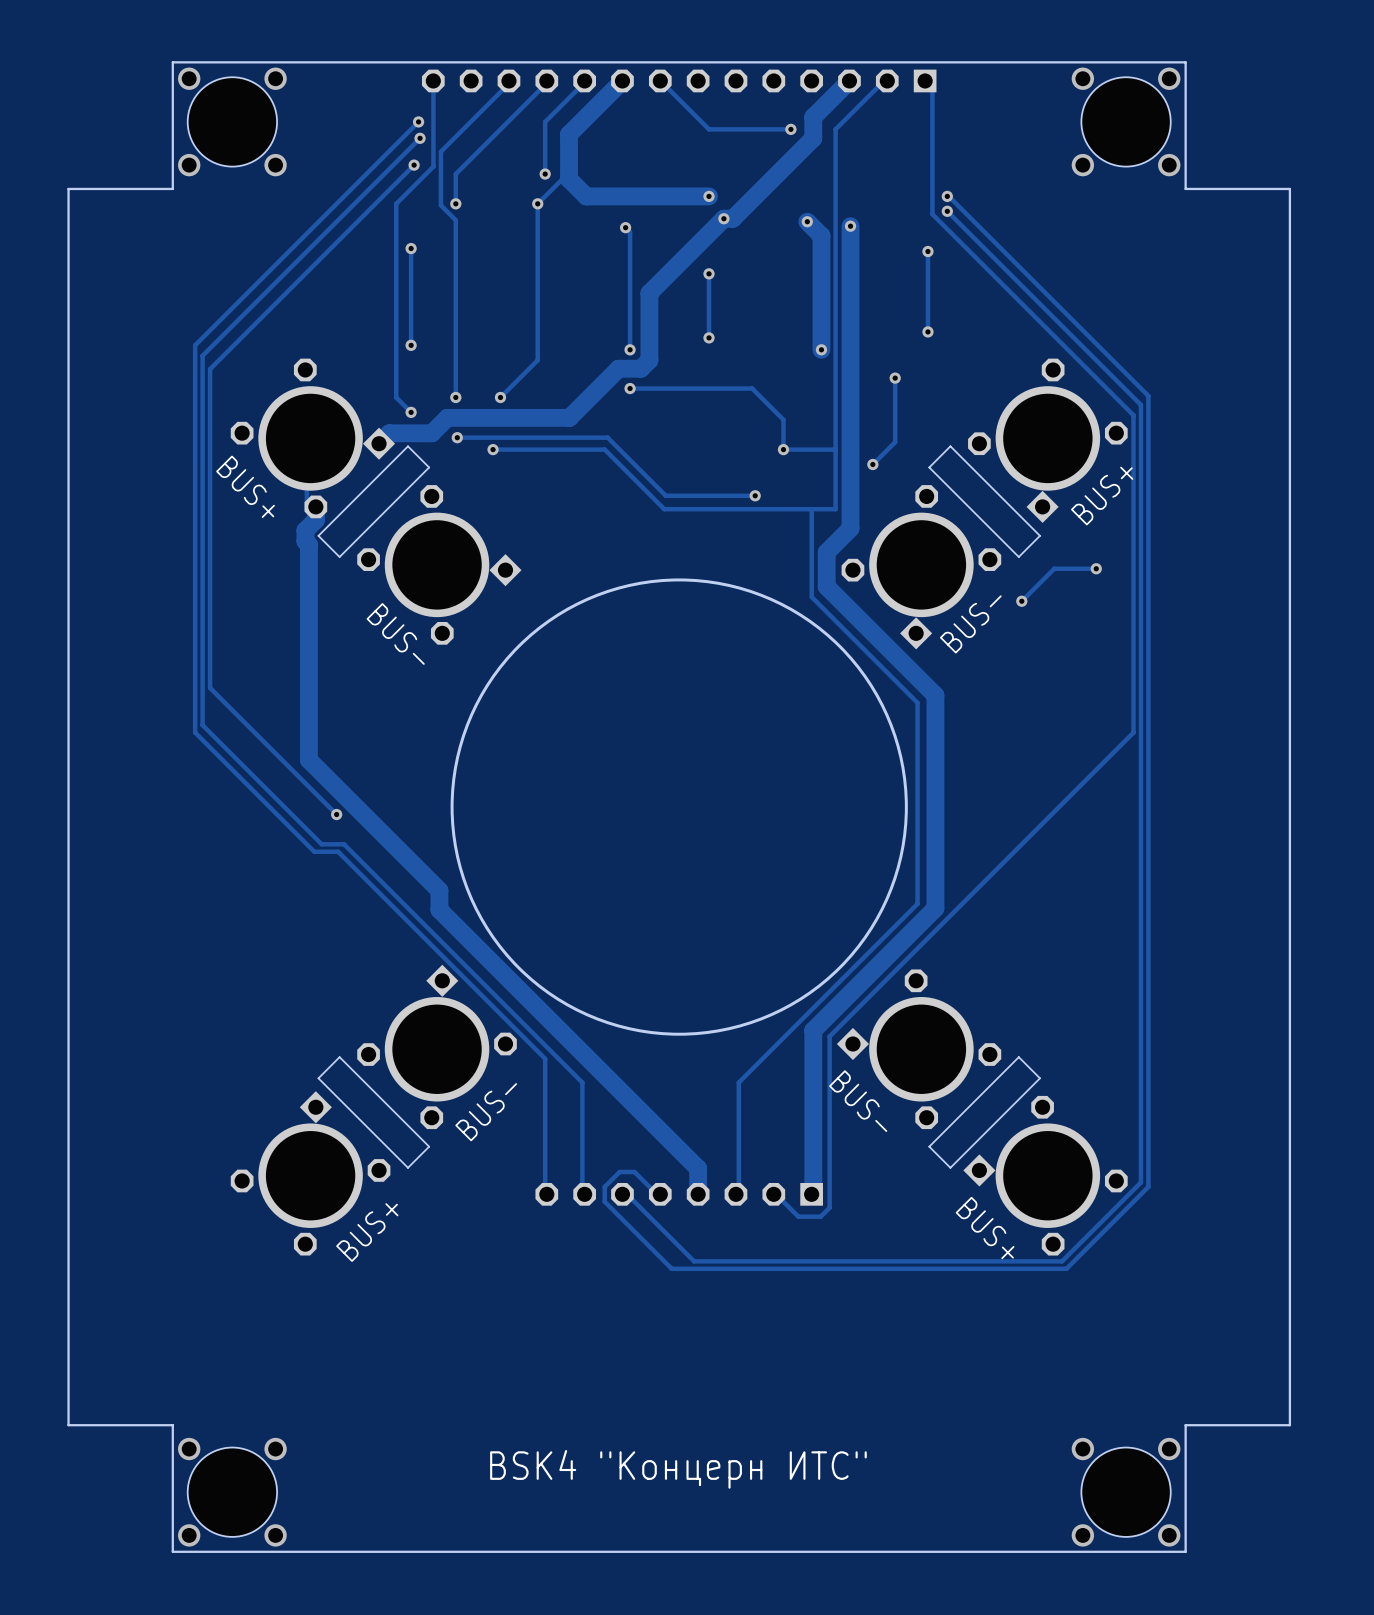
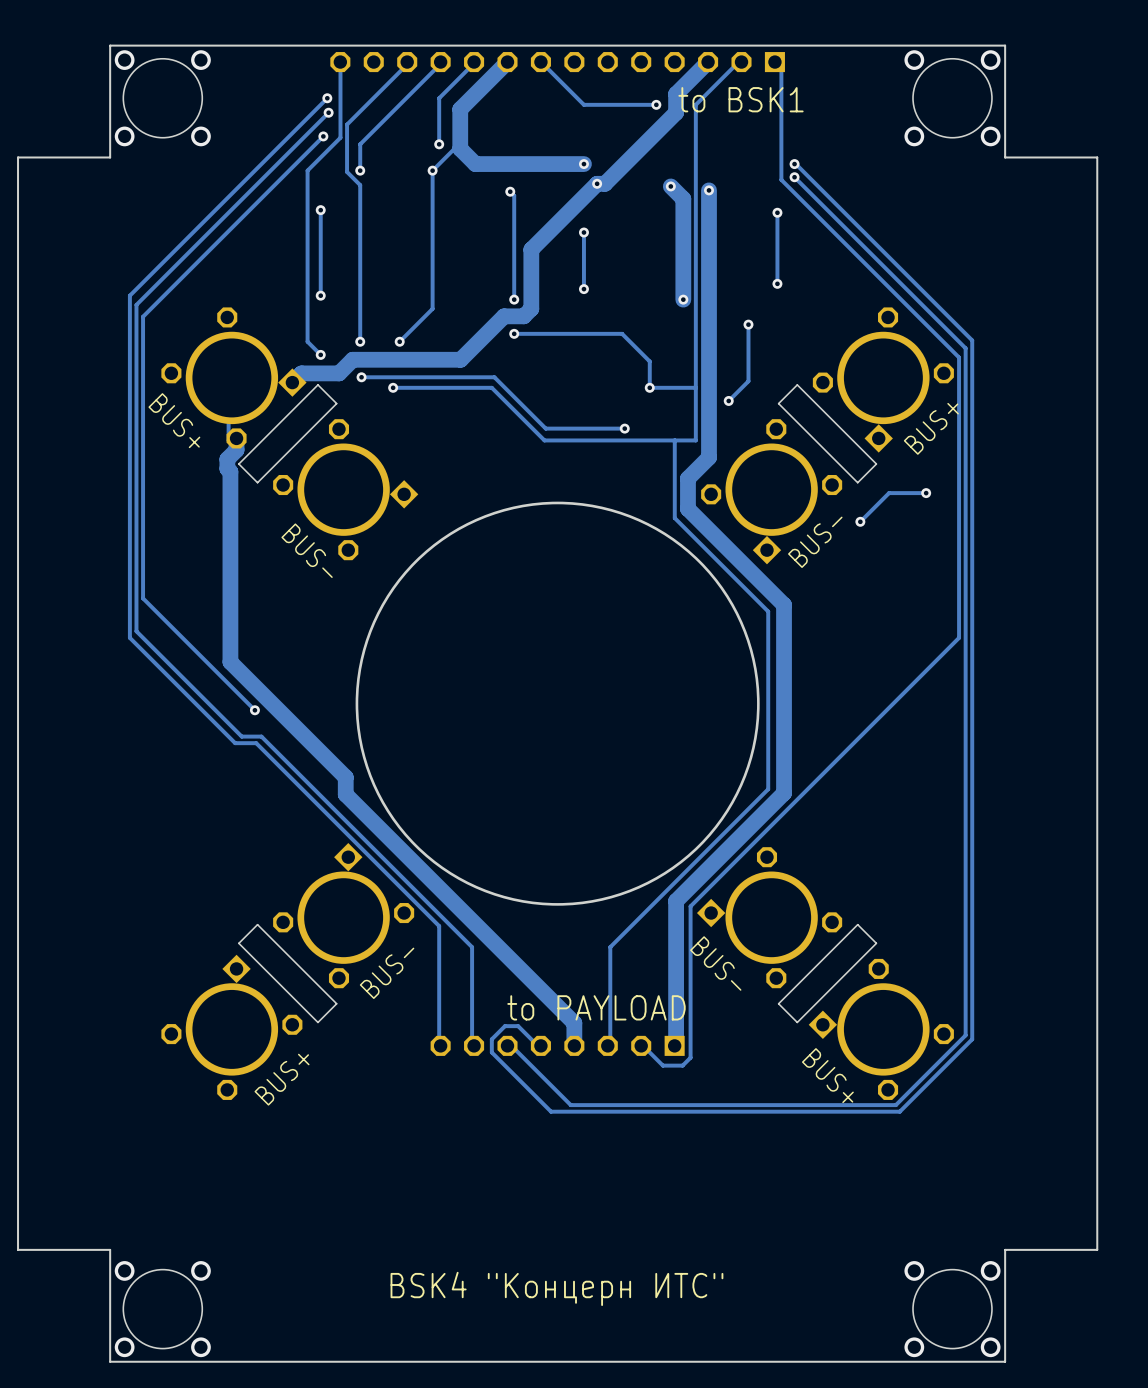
text: none -> to BSK1 (741, 99)
text: none -> to PAYLOAD (596, 1007)

